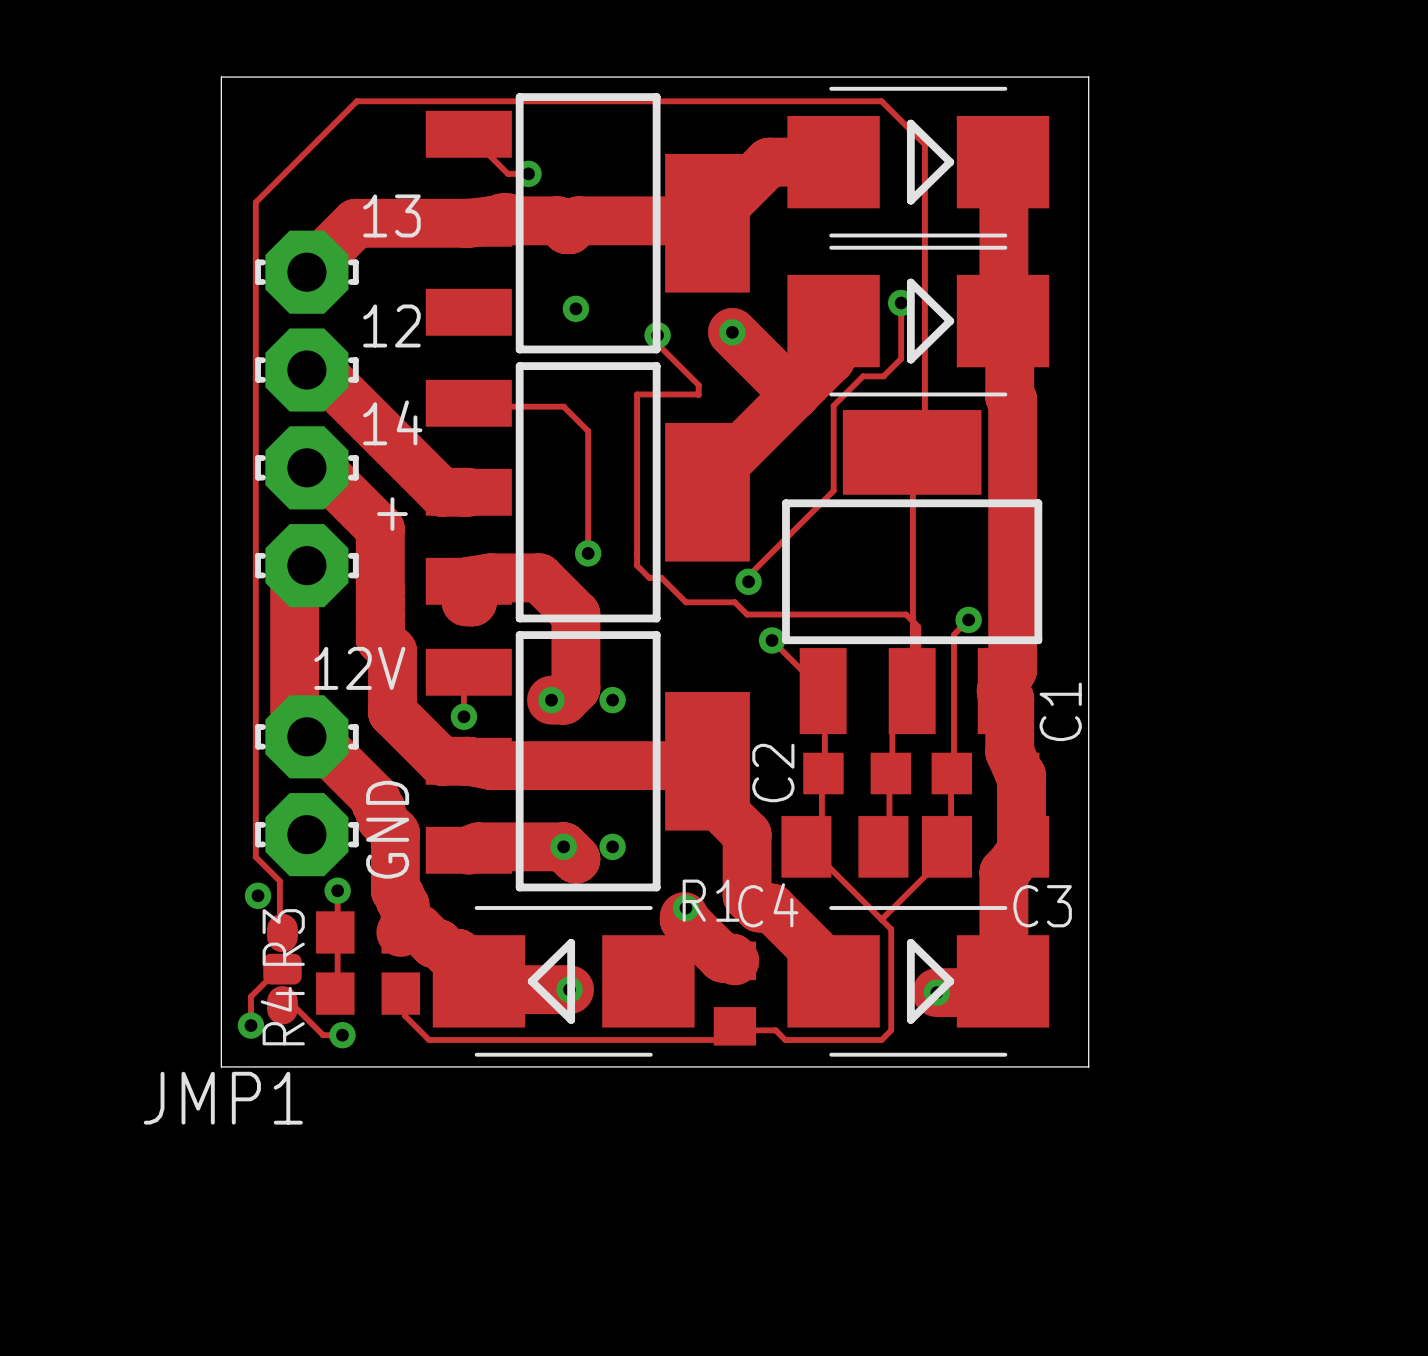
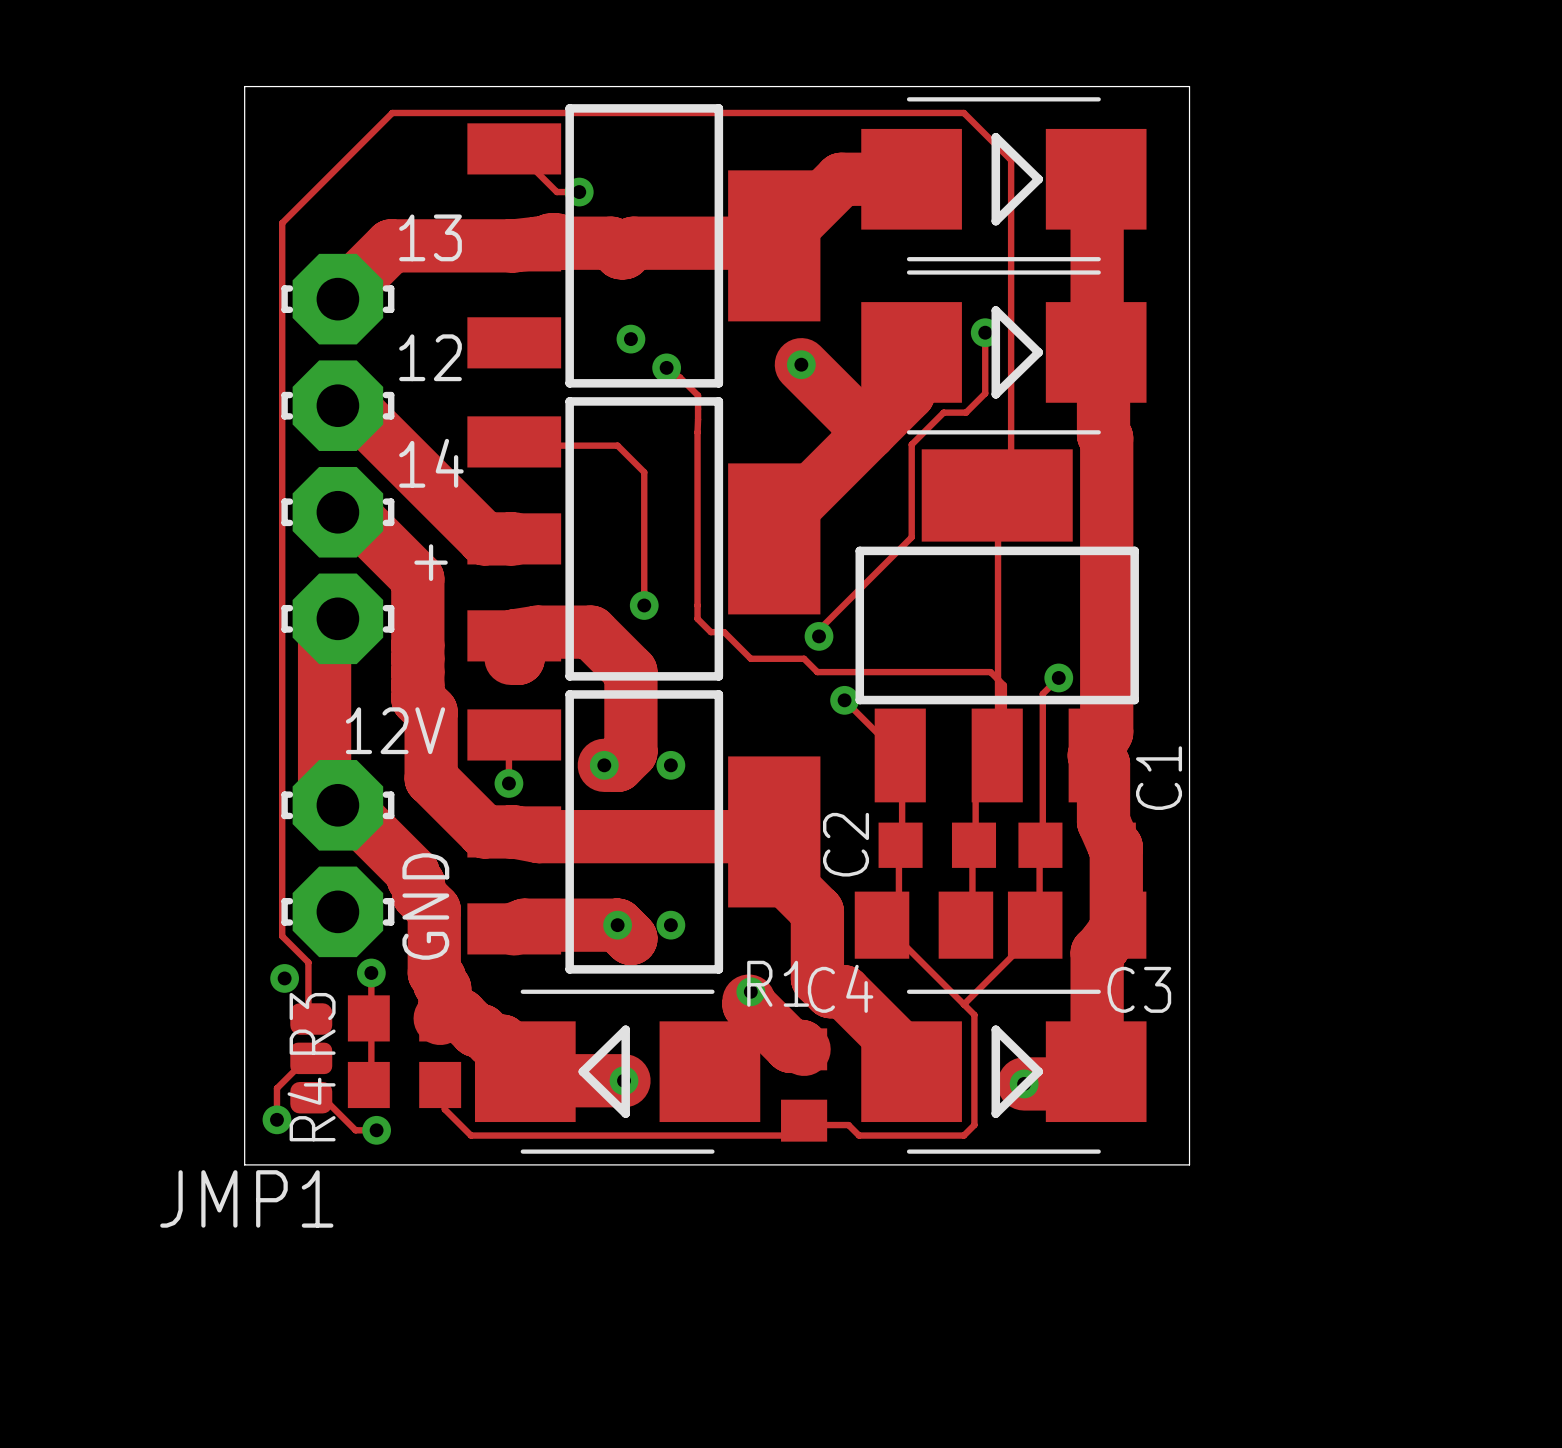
track: (657, 335) (657, 344) (698, 385) -> none
via position: (657, 335) -> (666, 367)
track: (698, 385) (698, 394) -> none
track: (637, 394) (698, 394) -> (697, 432) (698, 395) (679, 377) (666, 367)
JMP1 footprint: [263, 913, 302, 1025] -> [290, 1003, 333, 1114]

